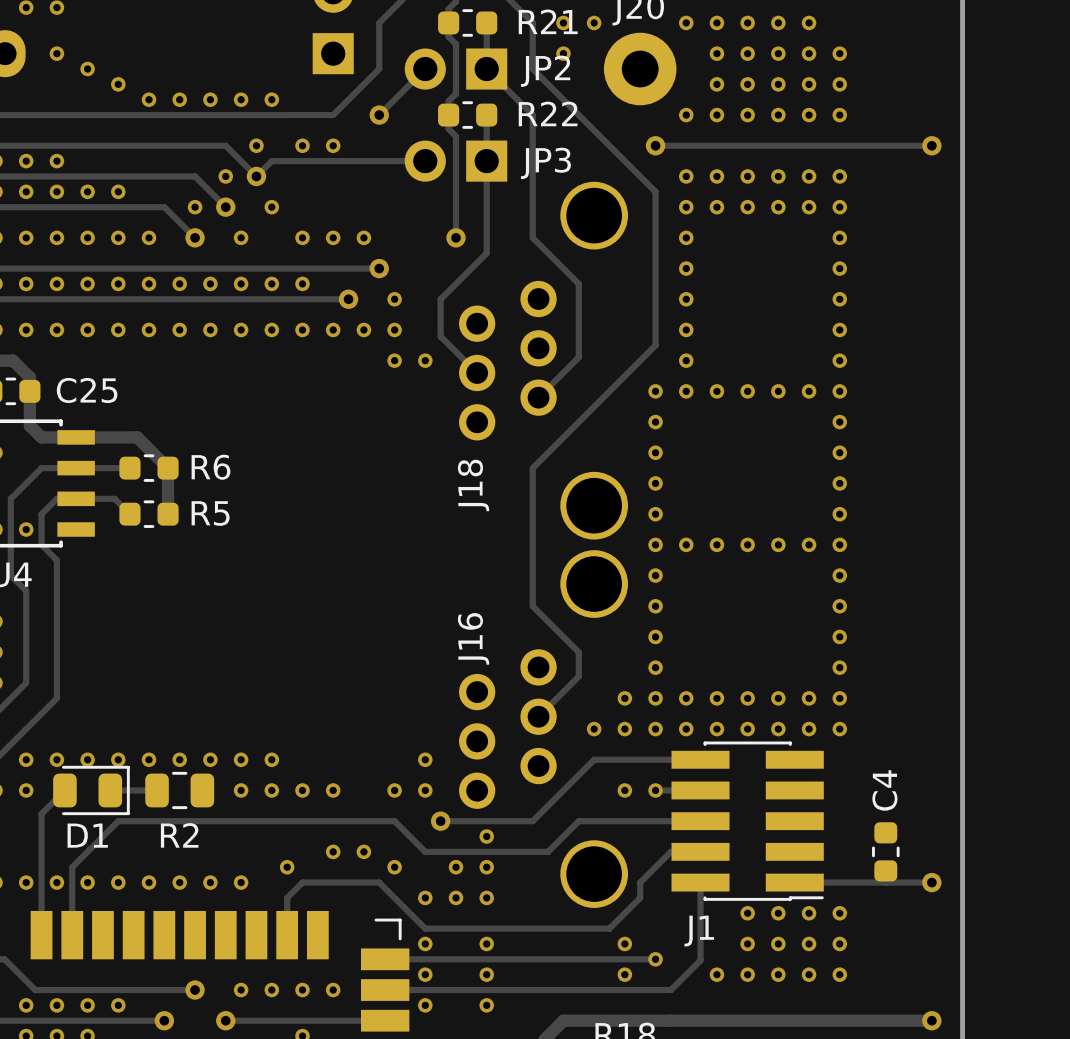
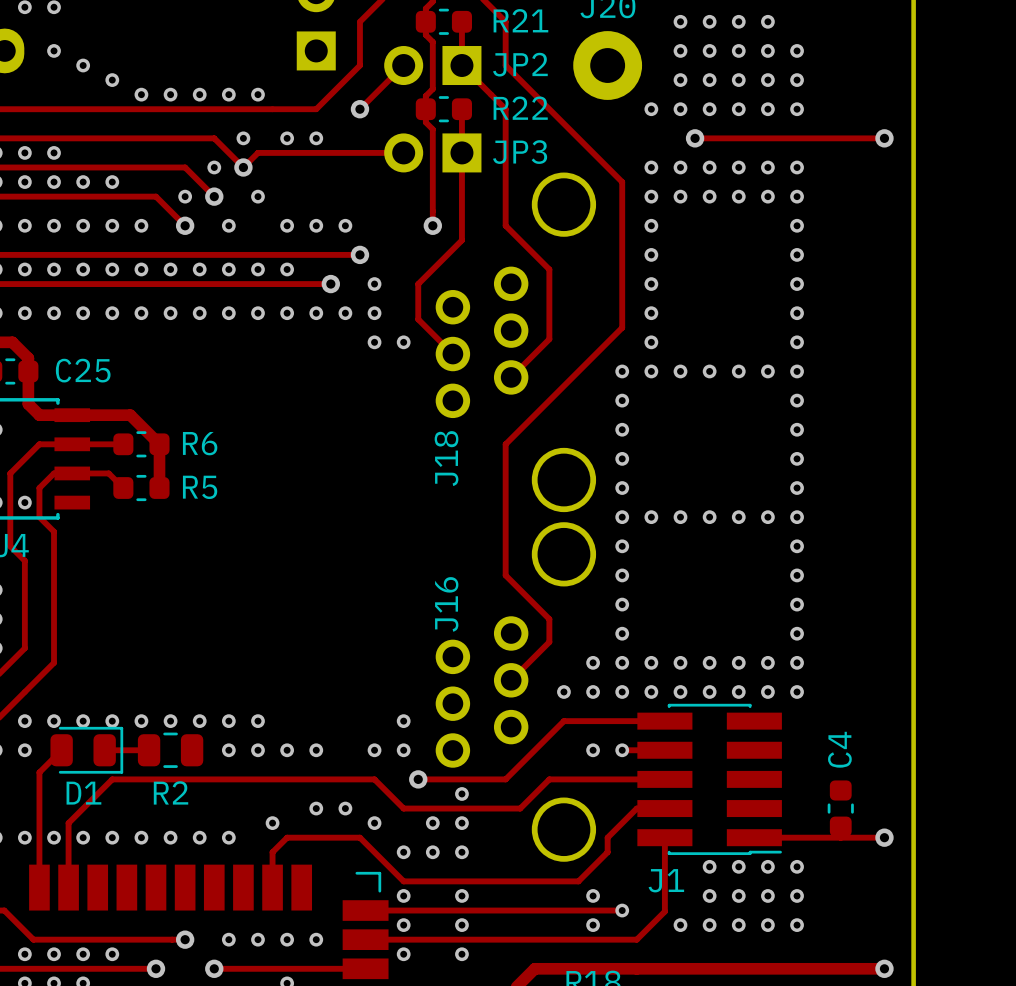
via: (563, 22) -> none
via: (594, 22) -> none
via: (686, 22) -> none
via: (563, 53) -> none
track: (655, 145) (732, 145) -> none
via position: (655, 145) -> (695, 138)

